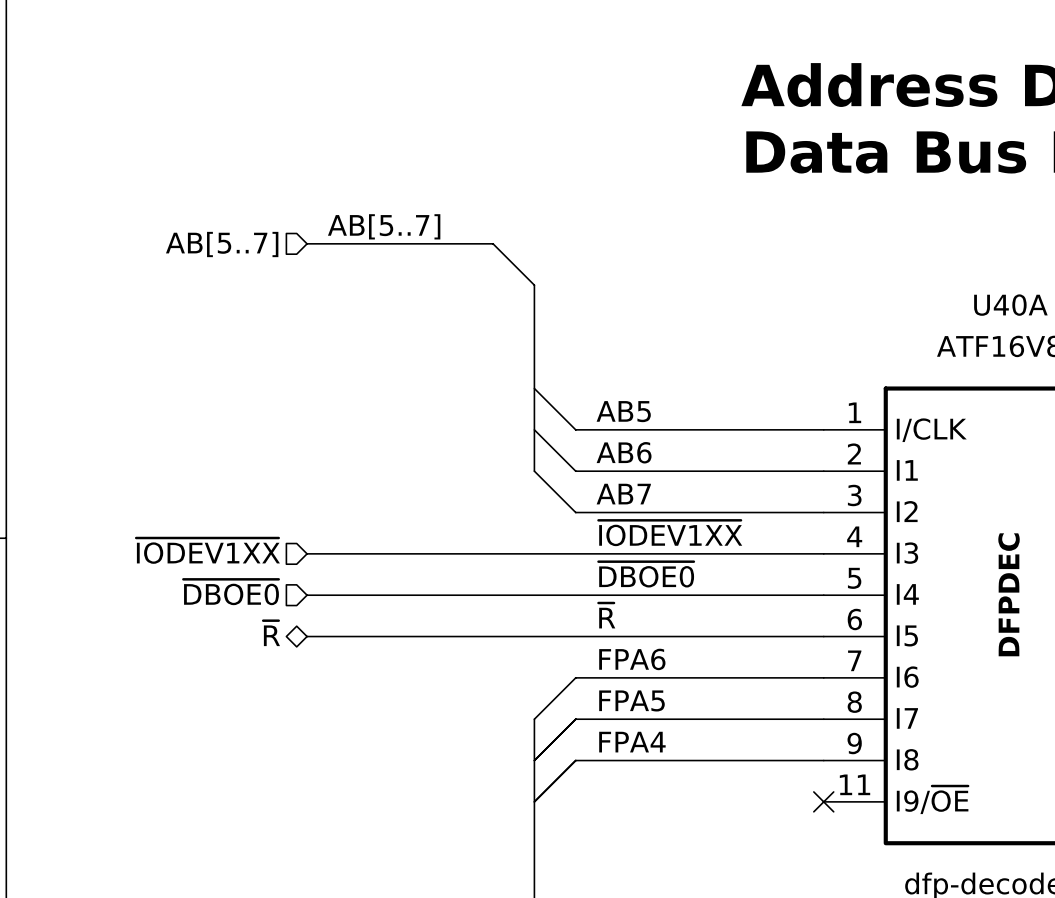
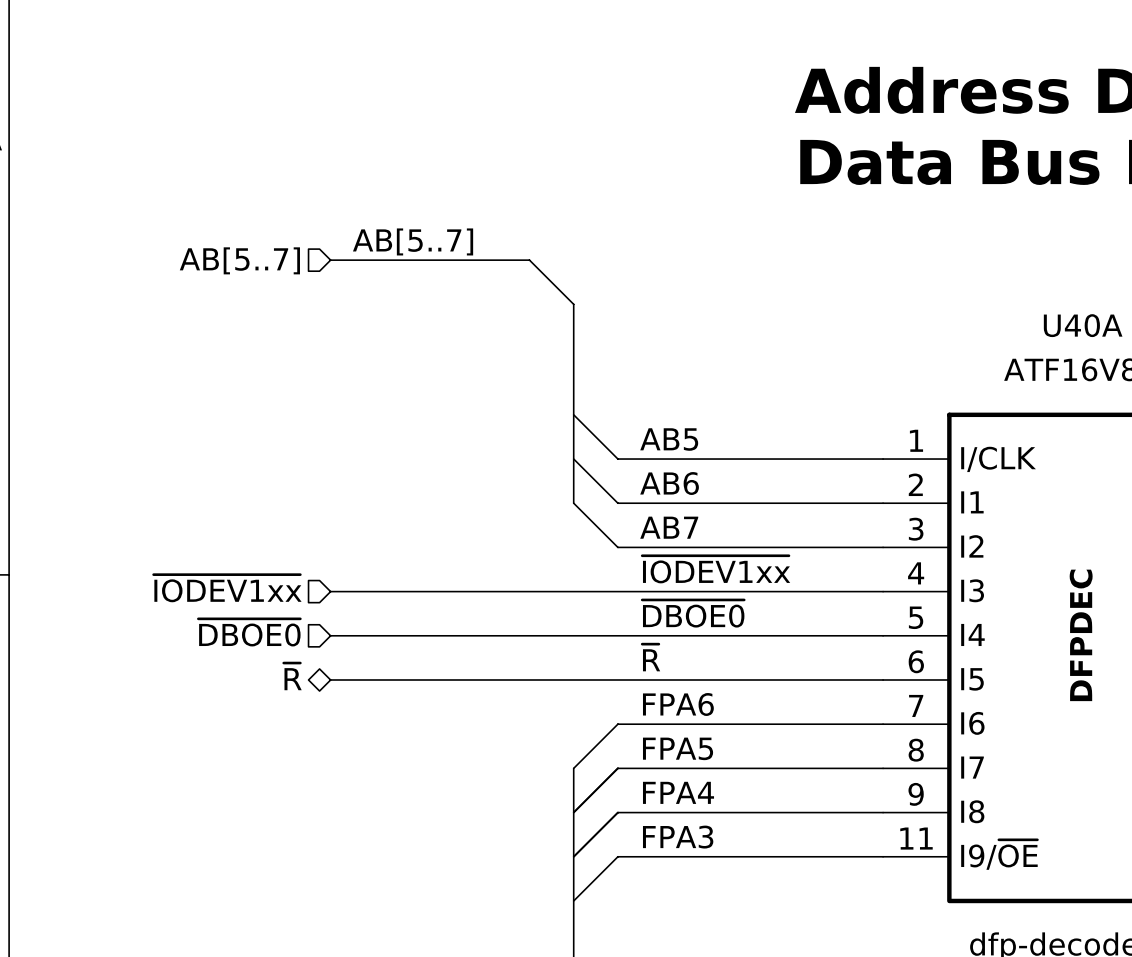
label: ~{IODEV1XX} (670, 533) -> ~{IODEV1xx} (716, 569)
hierarchical label: ~{IODEV1XX} (208, 550) -> ~{IODEV1xx} (227, 588)
label: none -> FPA3 (678, 837)
wire: none -> (883, 856) (617, 856) (573, 900)
no-connect mark: (823, 801) -> none

